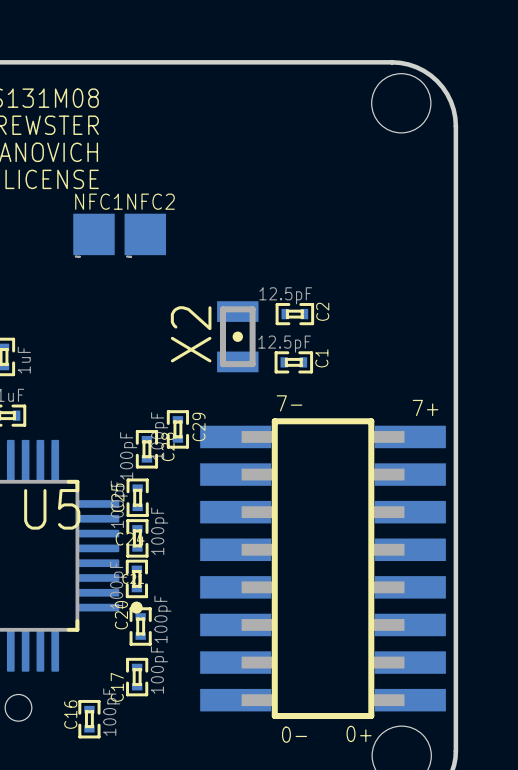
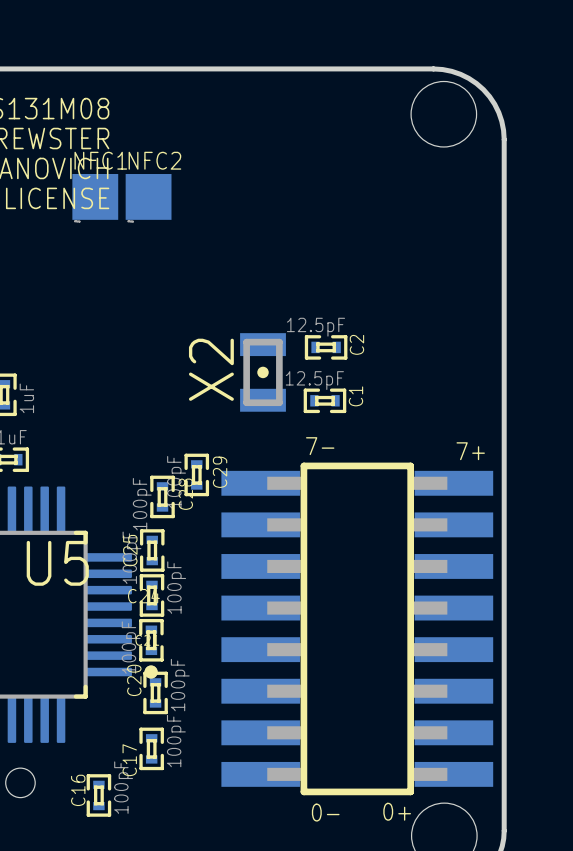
NFC1 position: (93, 234) -> (95, 196)
NFC2 position: (145, 234) -> (148, 196)

